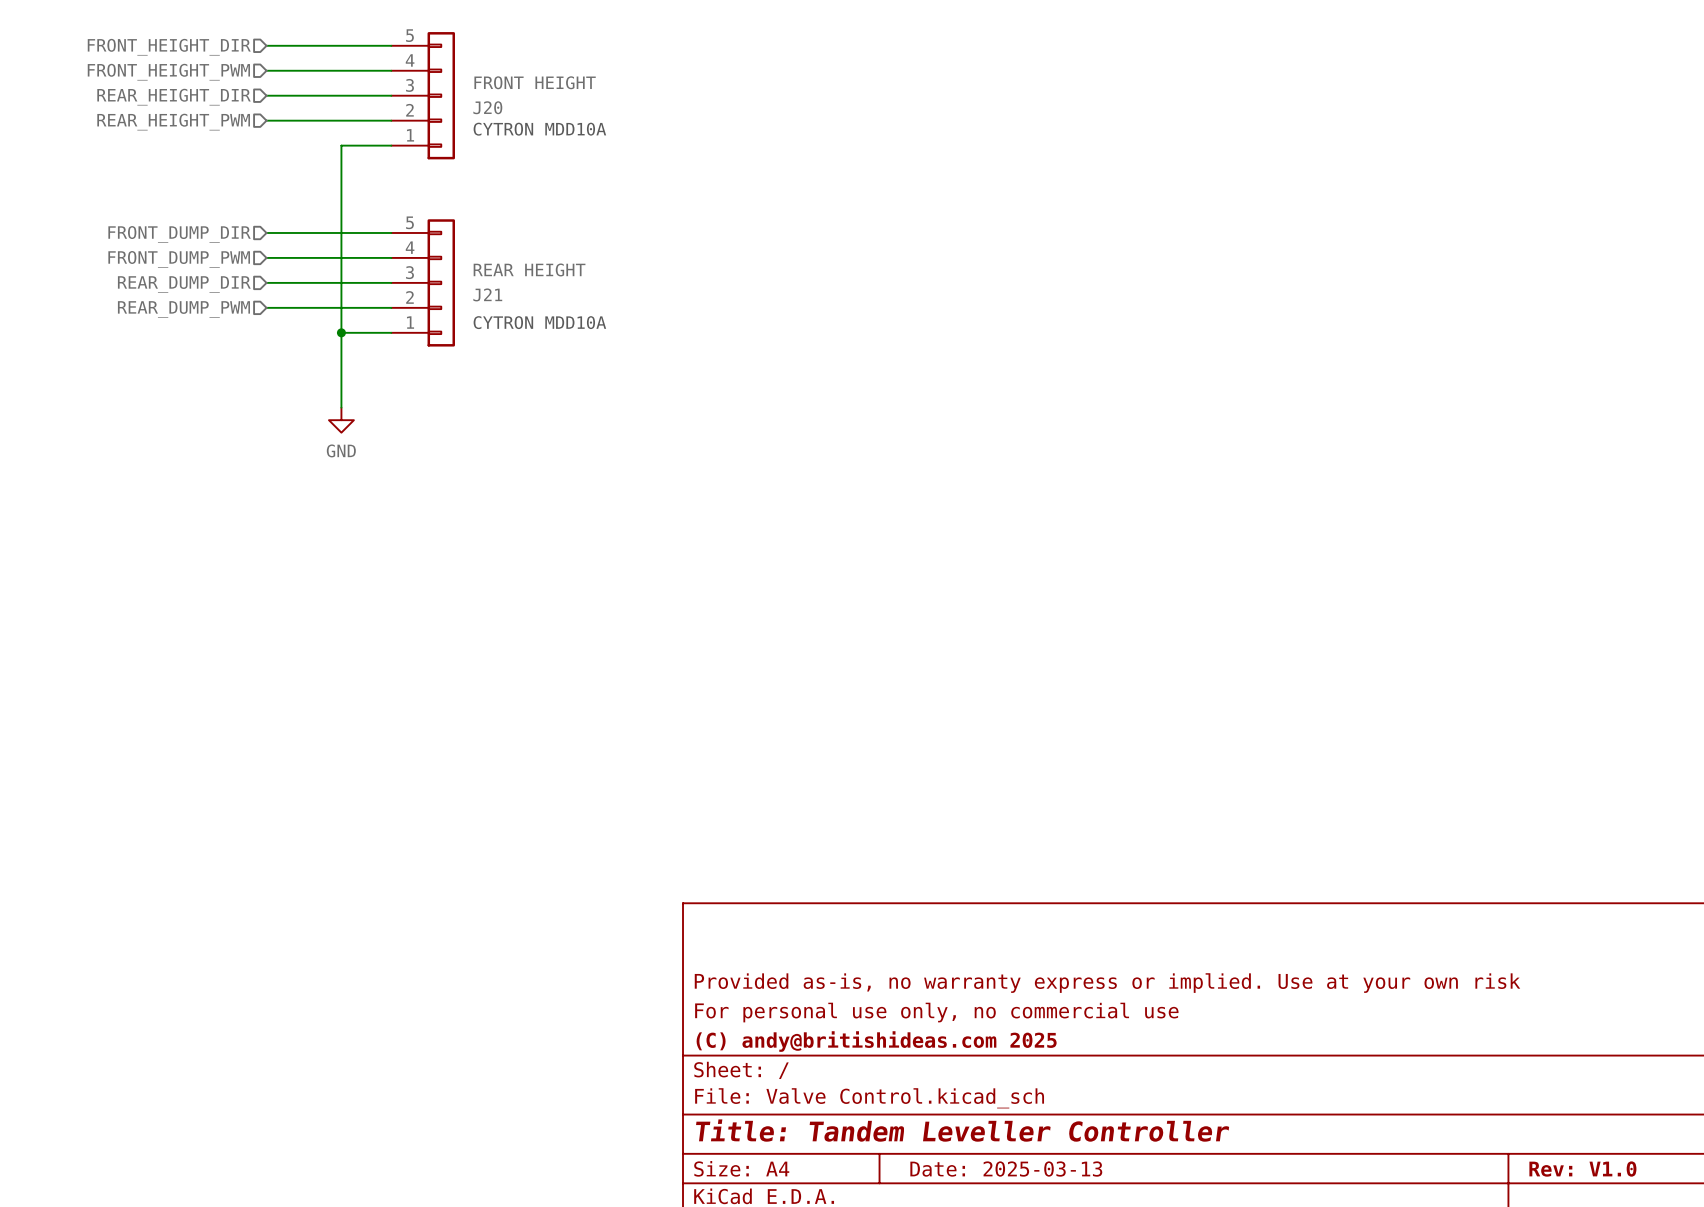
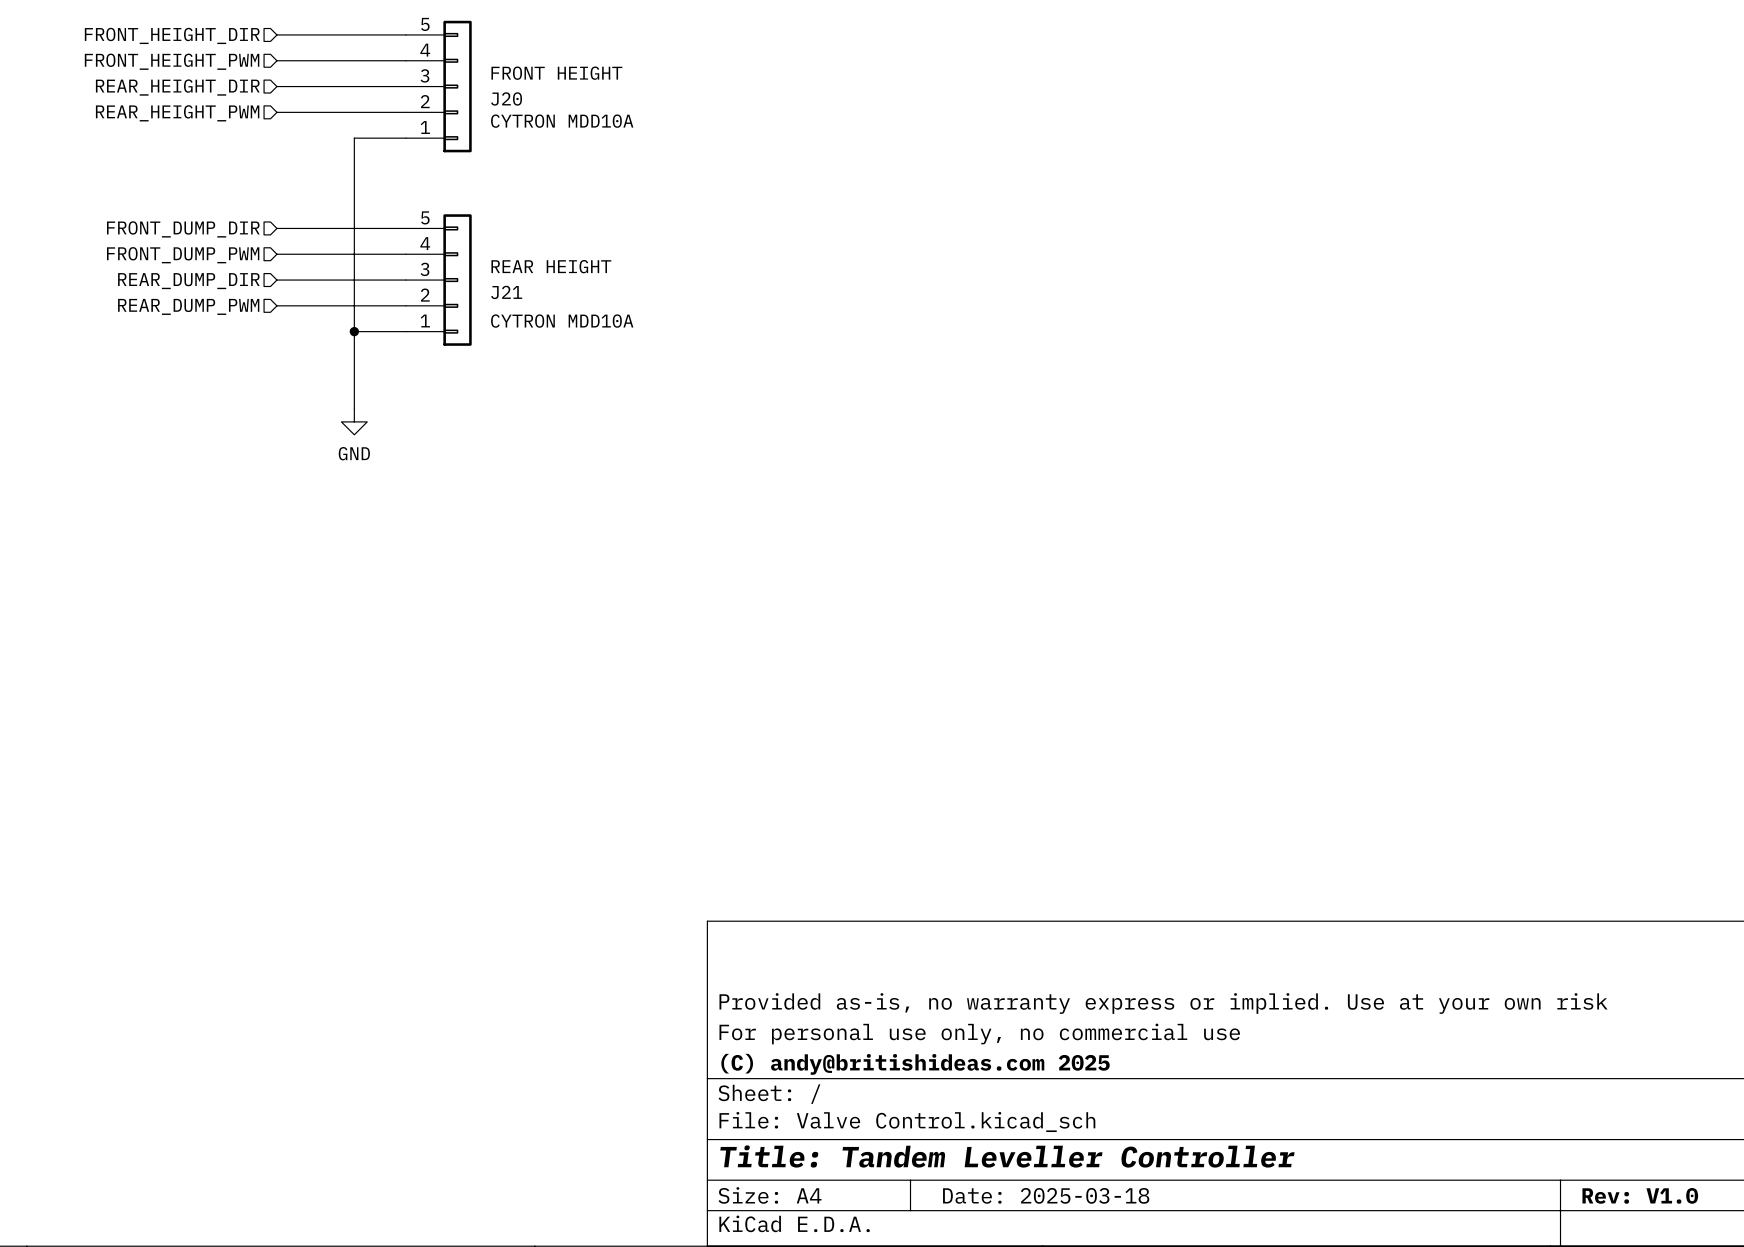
title block: Date: 2025-03-13 (1006, 1169) -> Date: 2025-03-18 (1046, 1195)

